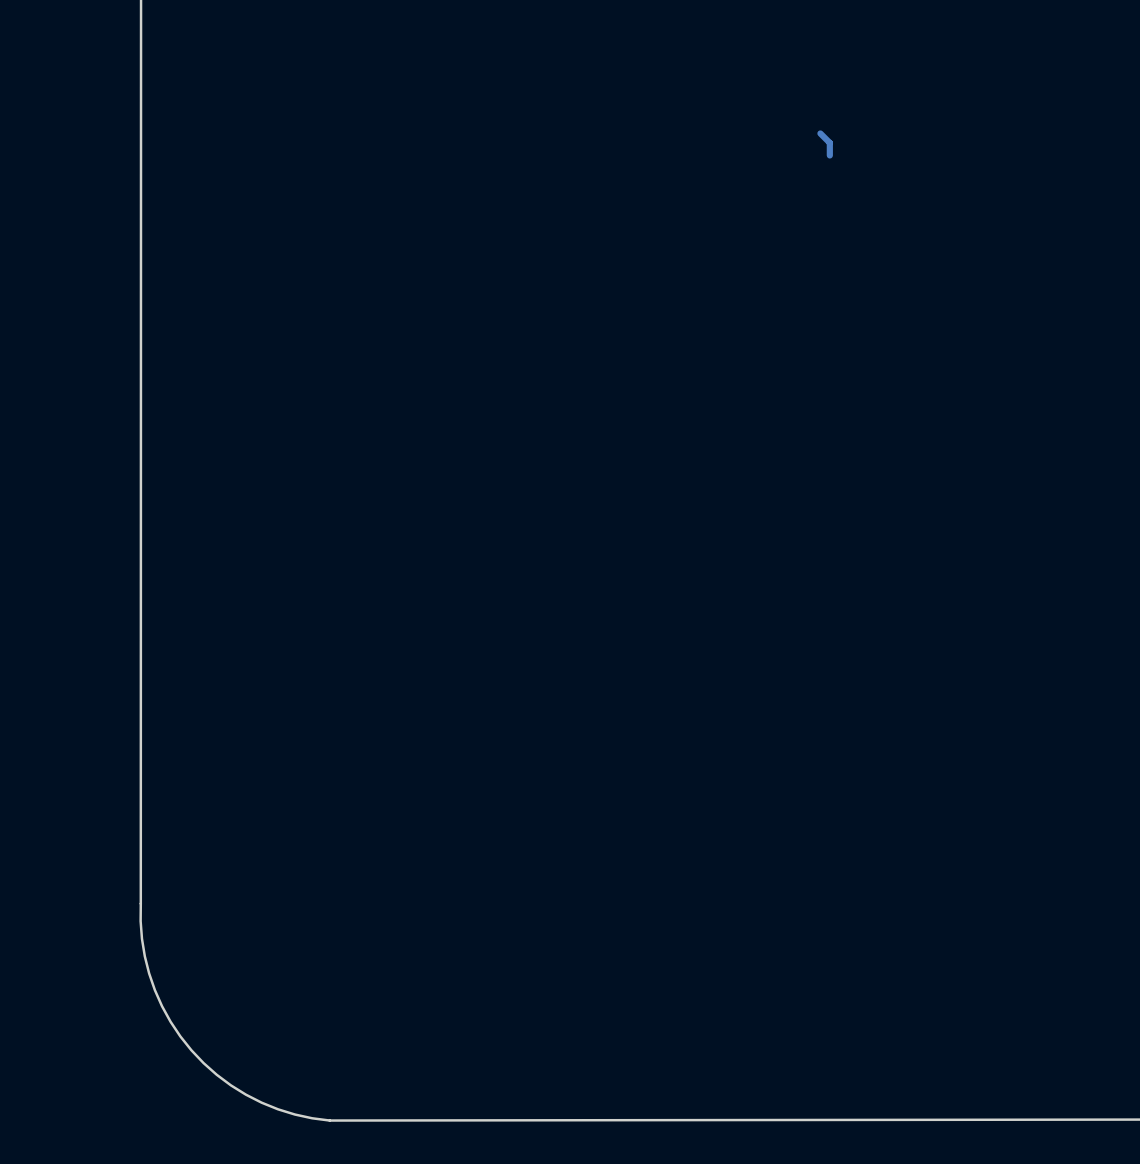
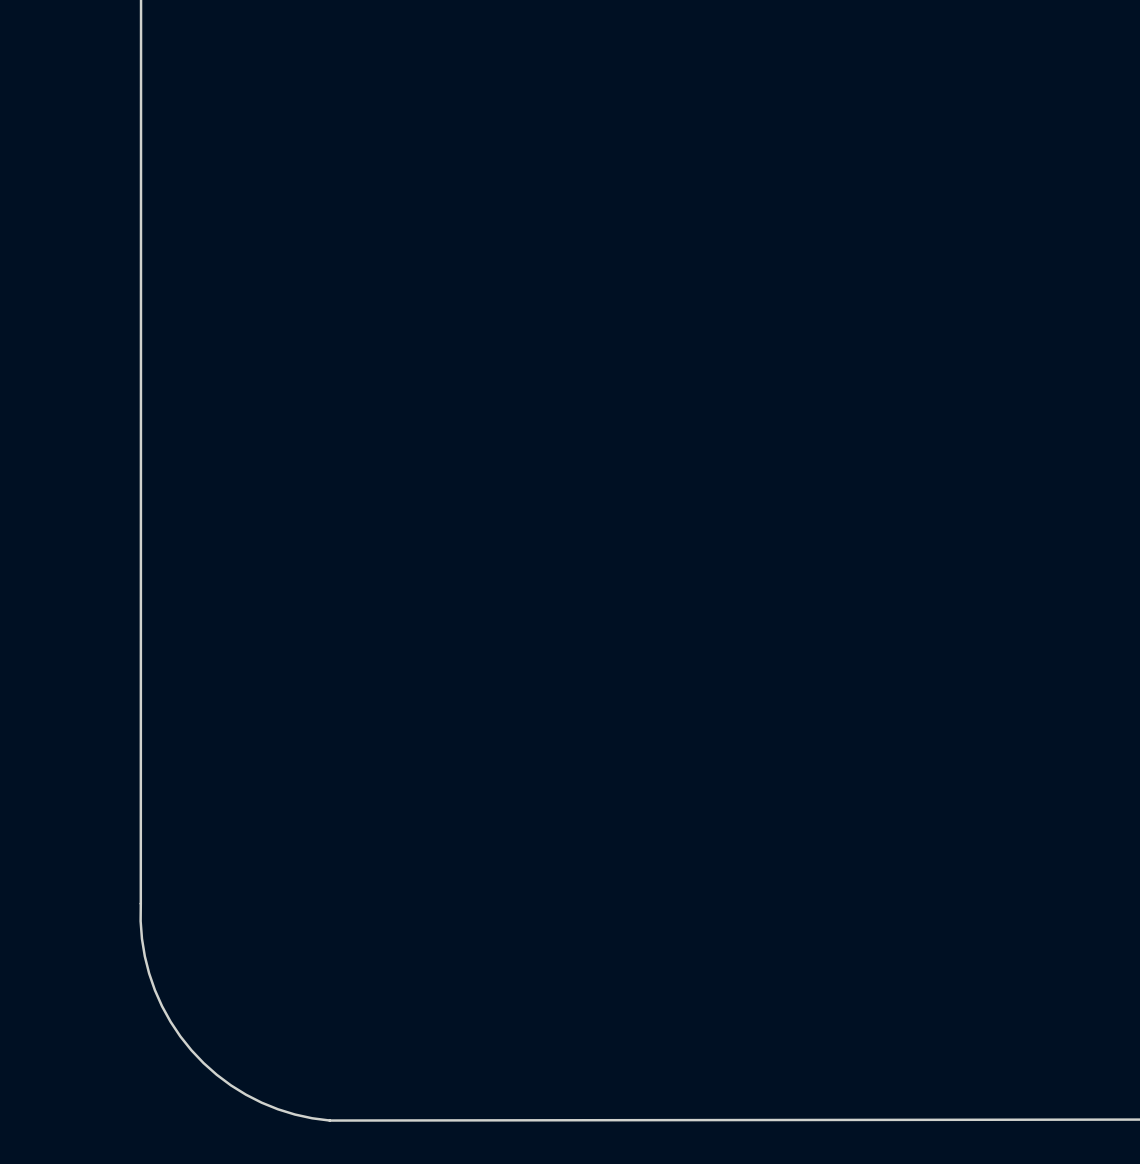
bottom track: (820, 133) (829, 142) (829, 155) -> none

